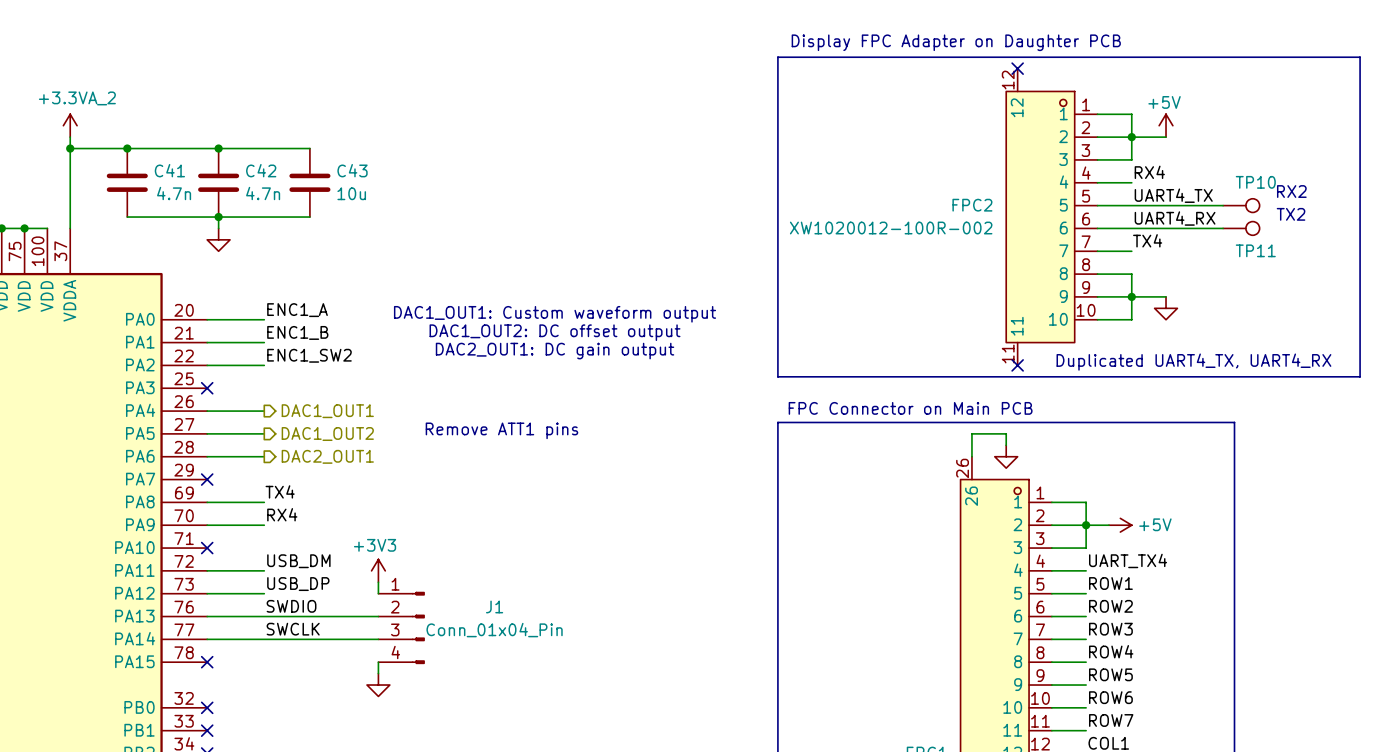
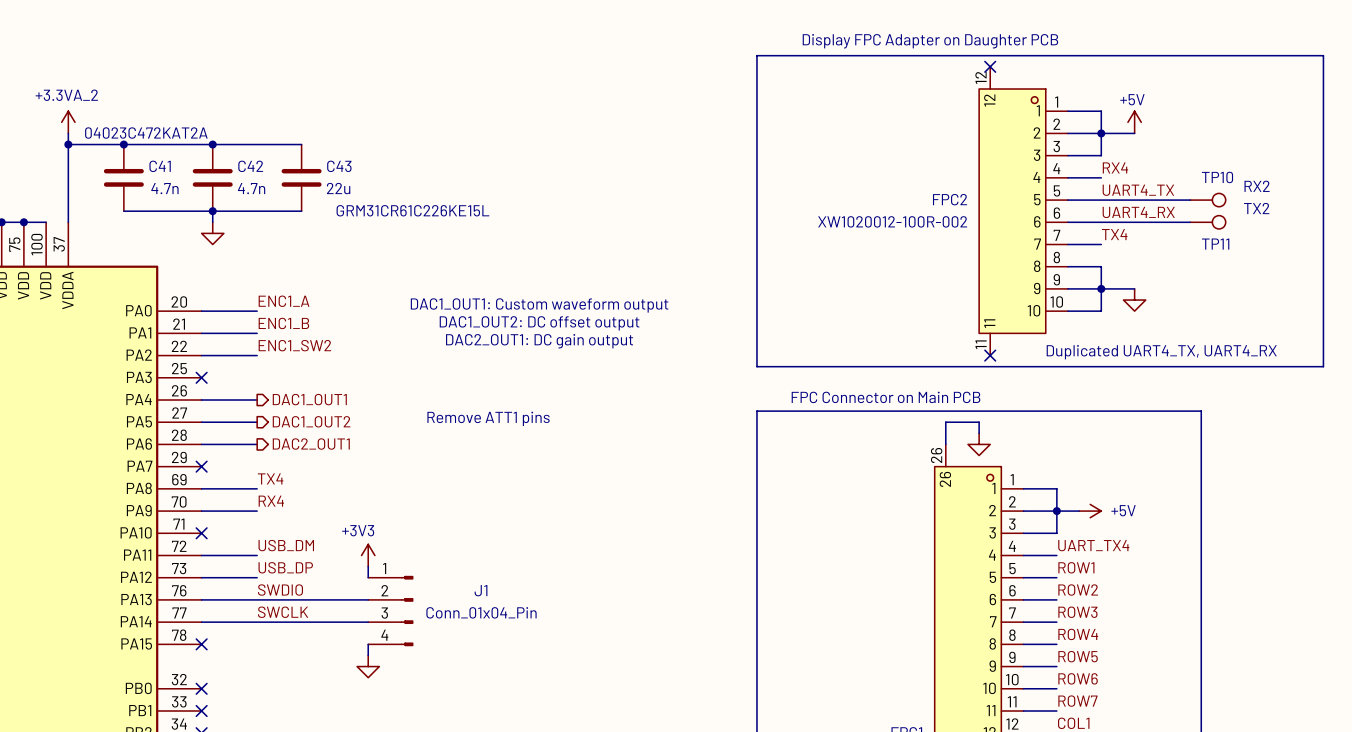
C41 text: none -> 04023C472KAT2A (146, 133)
C43 value: 10u (351, 193) -> 22u (338, 188)
C43 text: none -> GRM31CR61C226KE15L (412, 210)

